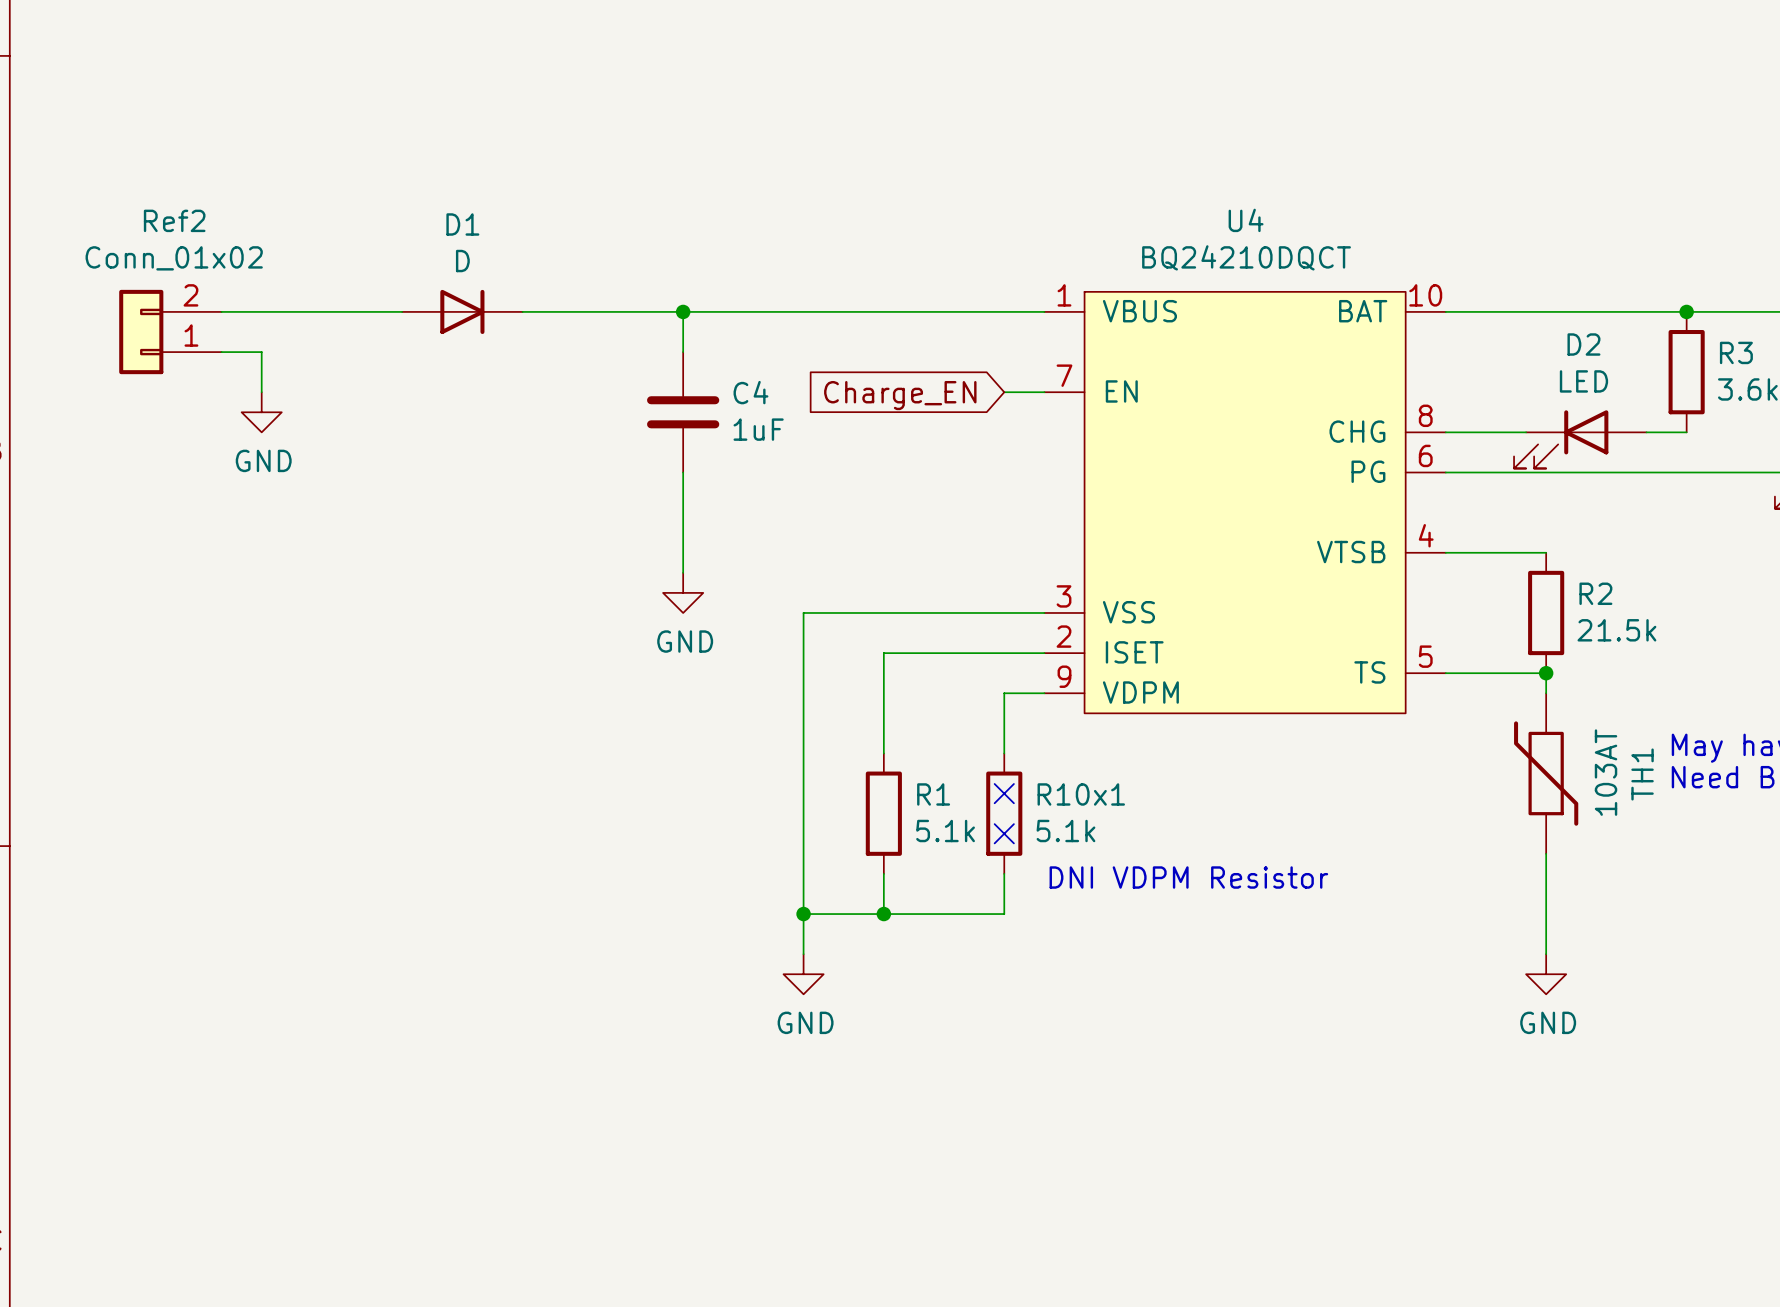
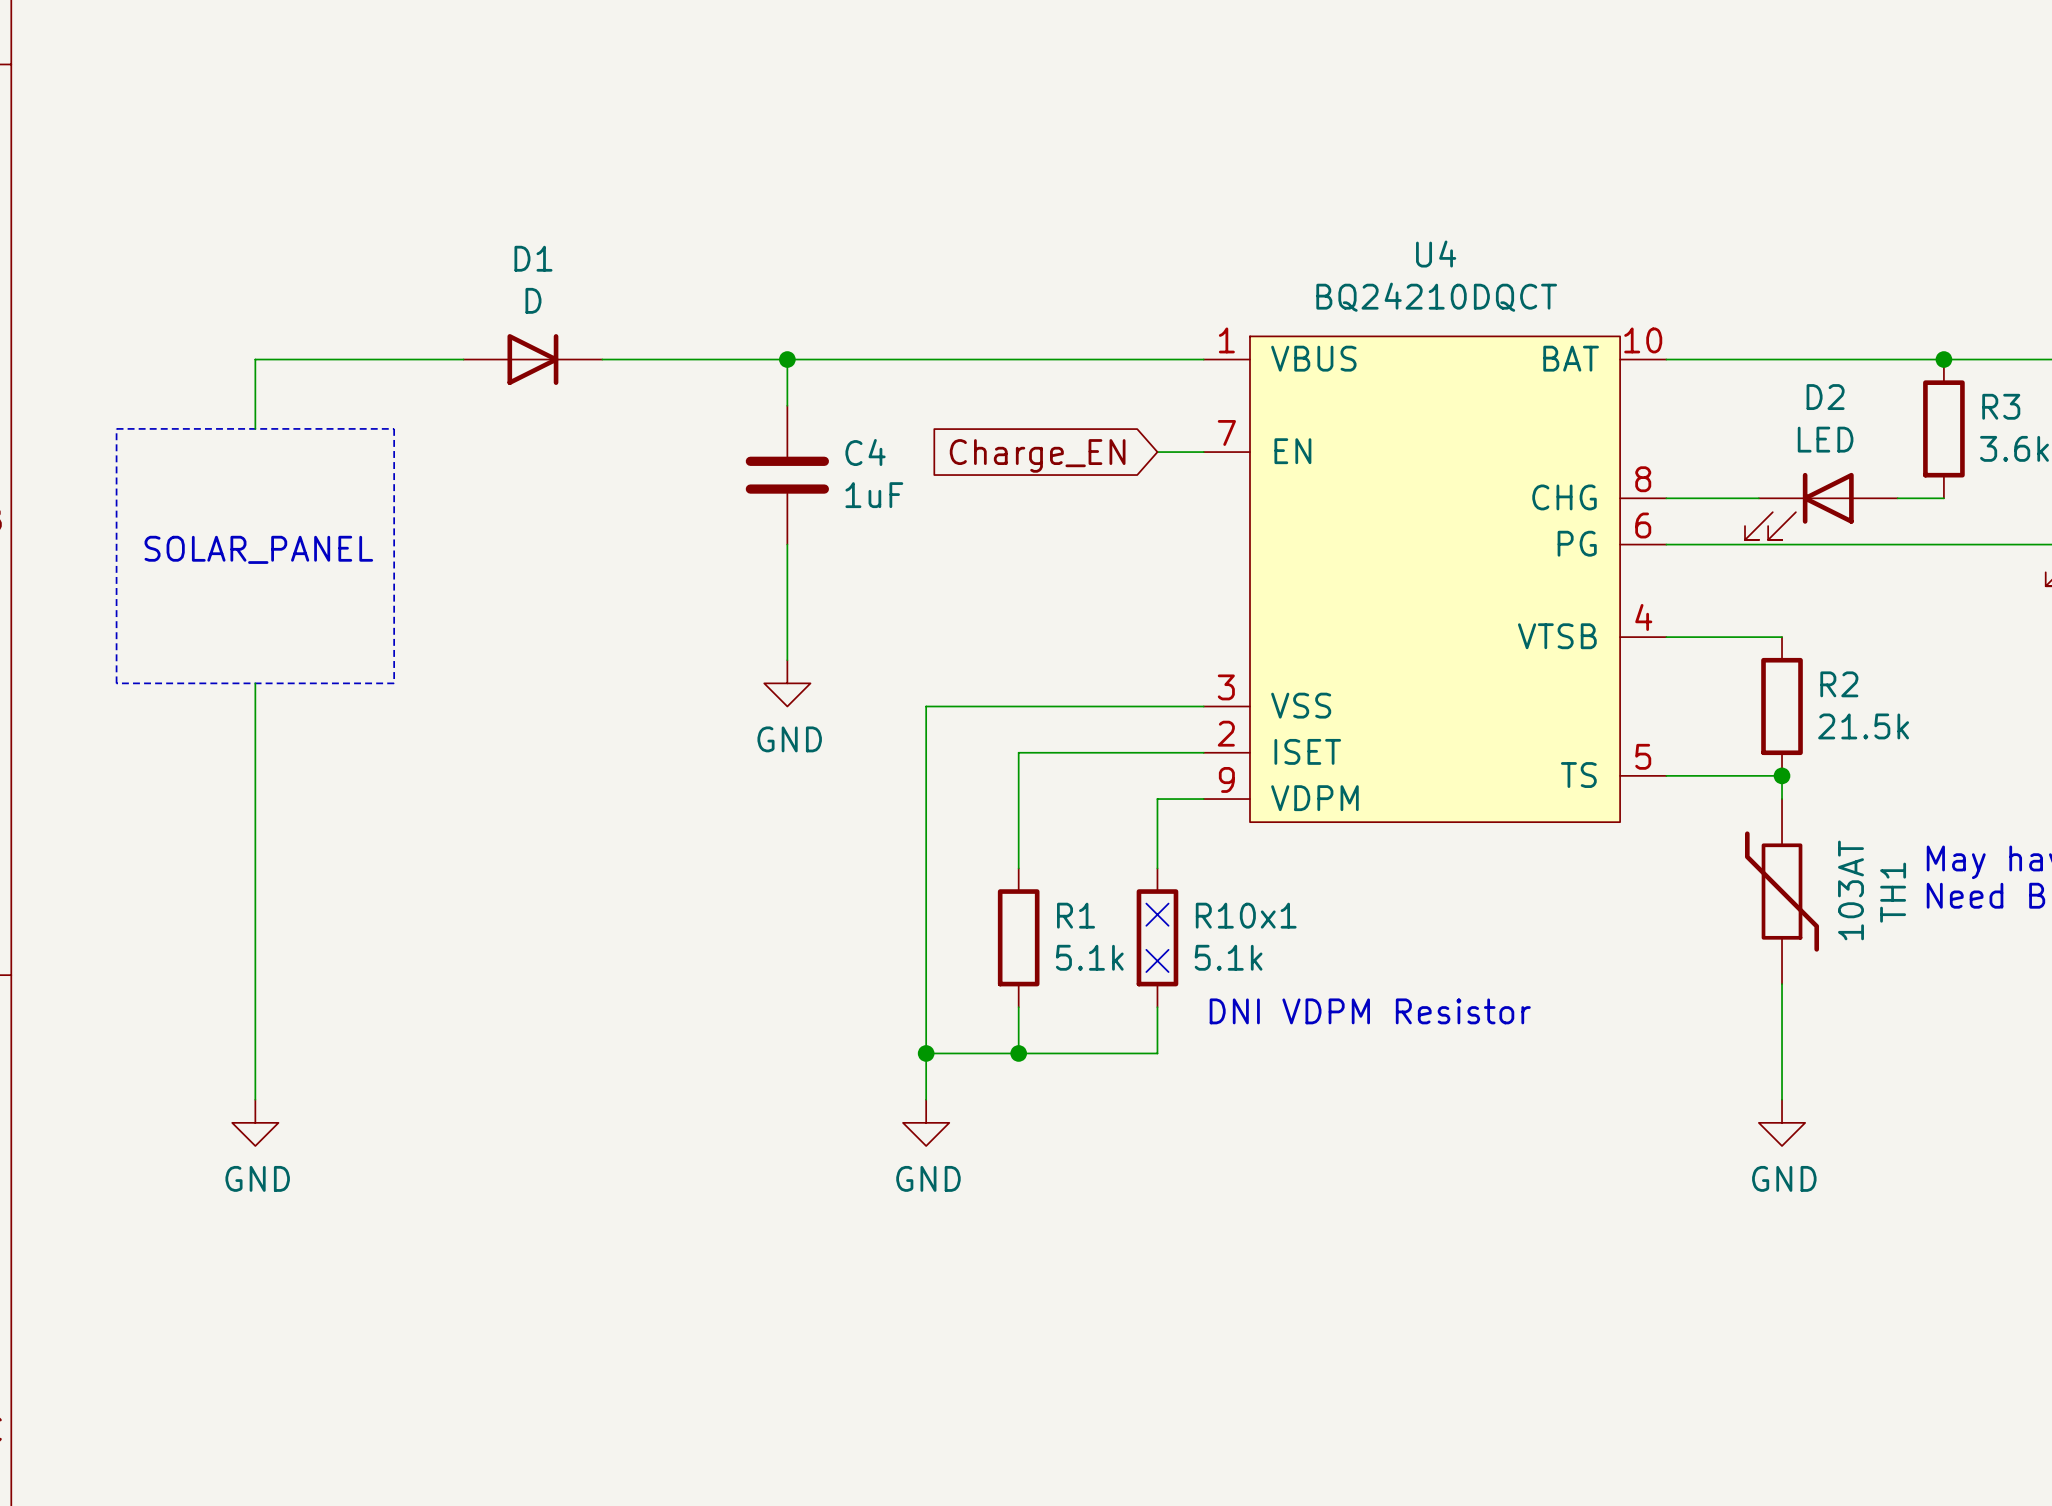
wire: none -> (255, 359) (255, 428)
Ref2: Conn_01x02 (170, 332) -> none
wire: (221, 352) (261, 352) (261, 392) -> none
line: none -> (116, 428) (116, 683) (394, 683) (394, 428) (116, 428)
power symbol: GND (261, 412) -> none
text: none -> SOLAR_PANEL (258, 549)
wire: none -> (255, 683) (255, 1099)
power symbol: none -> GND (255, 1122)

